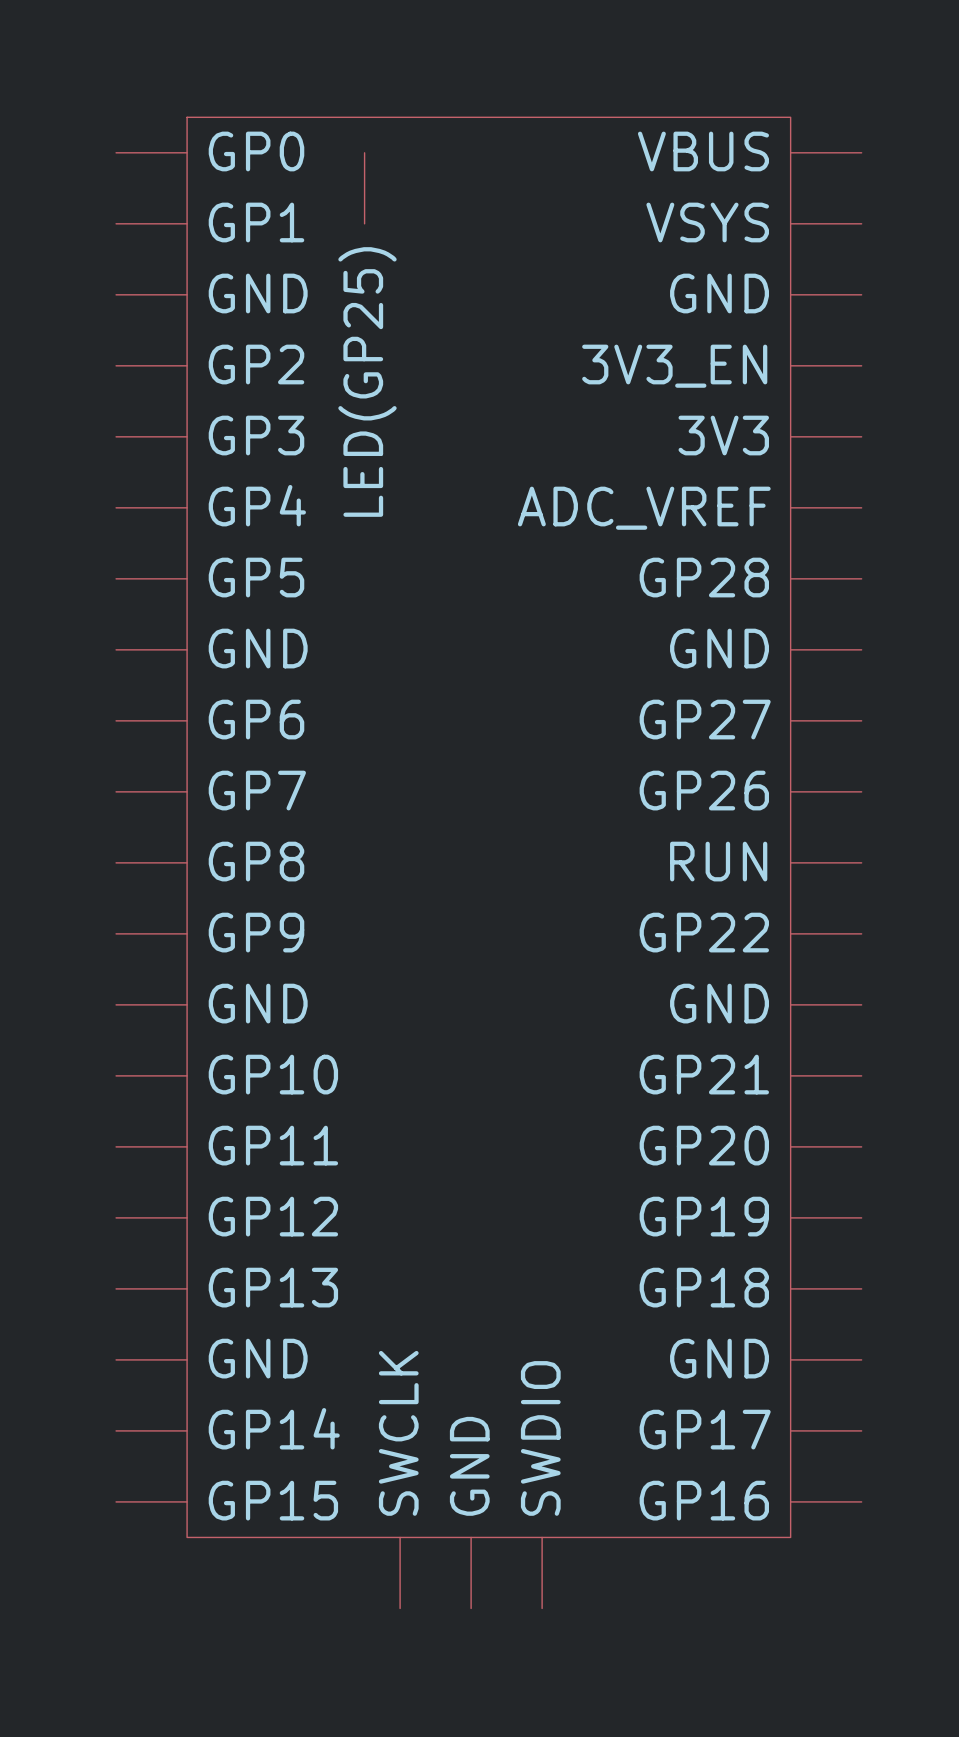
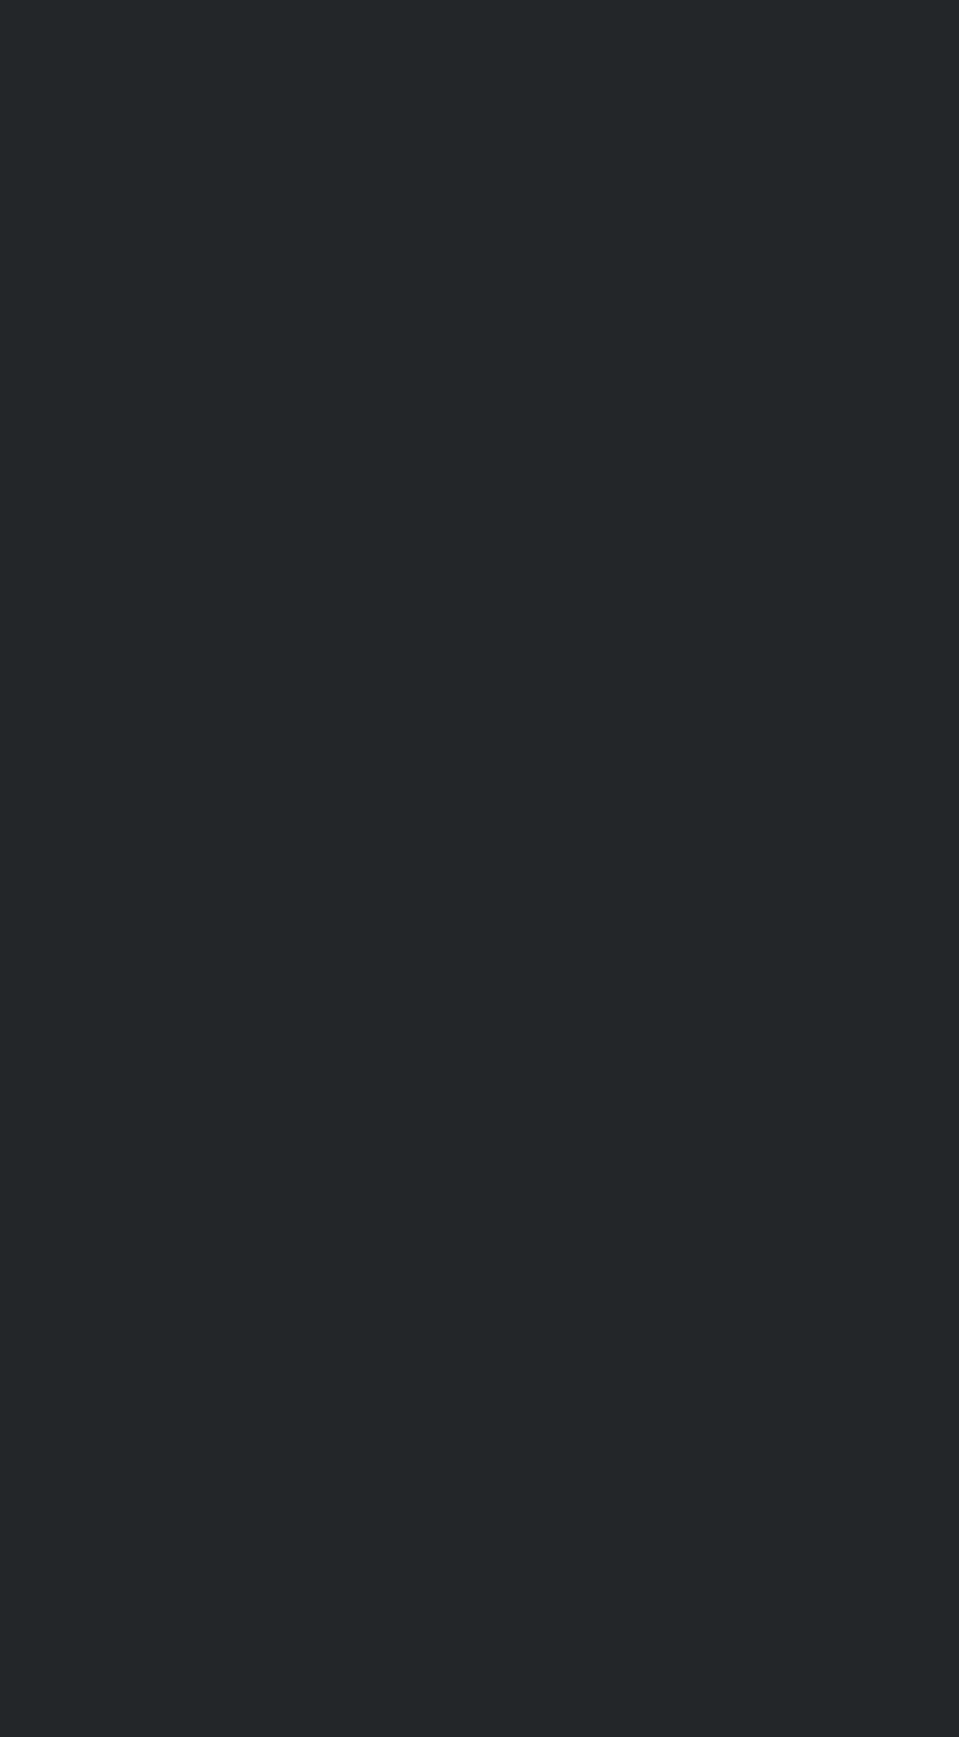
part: (488, 862) -> none

